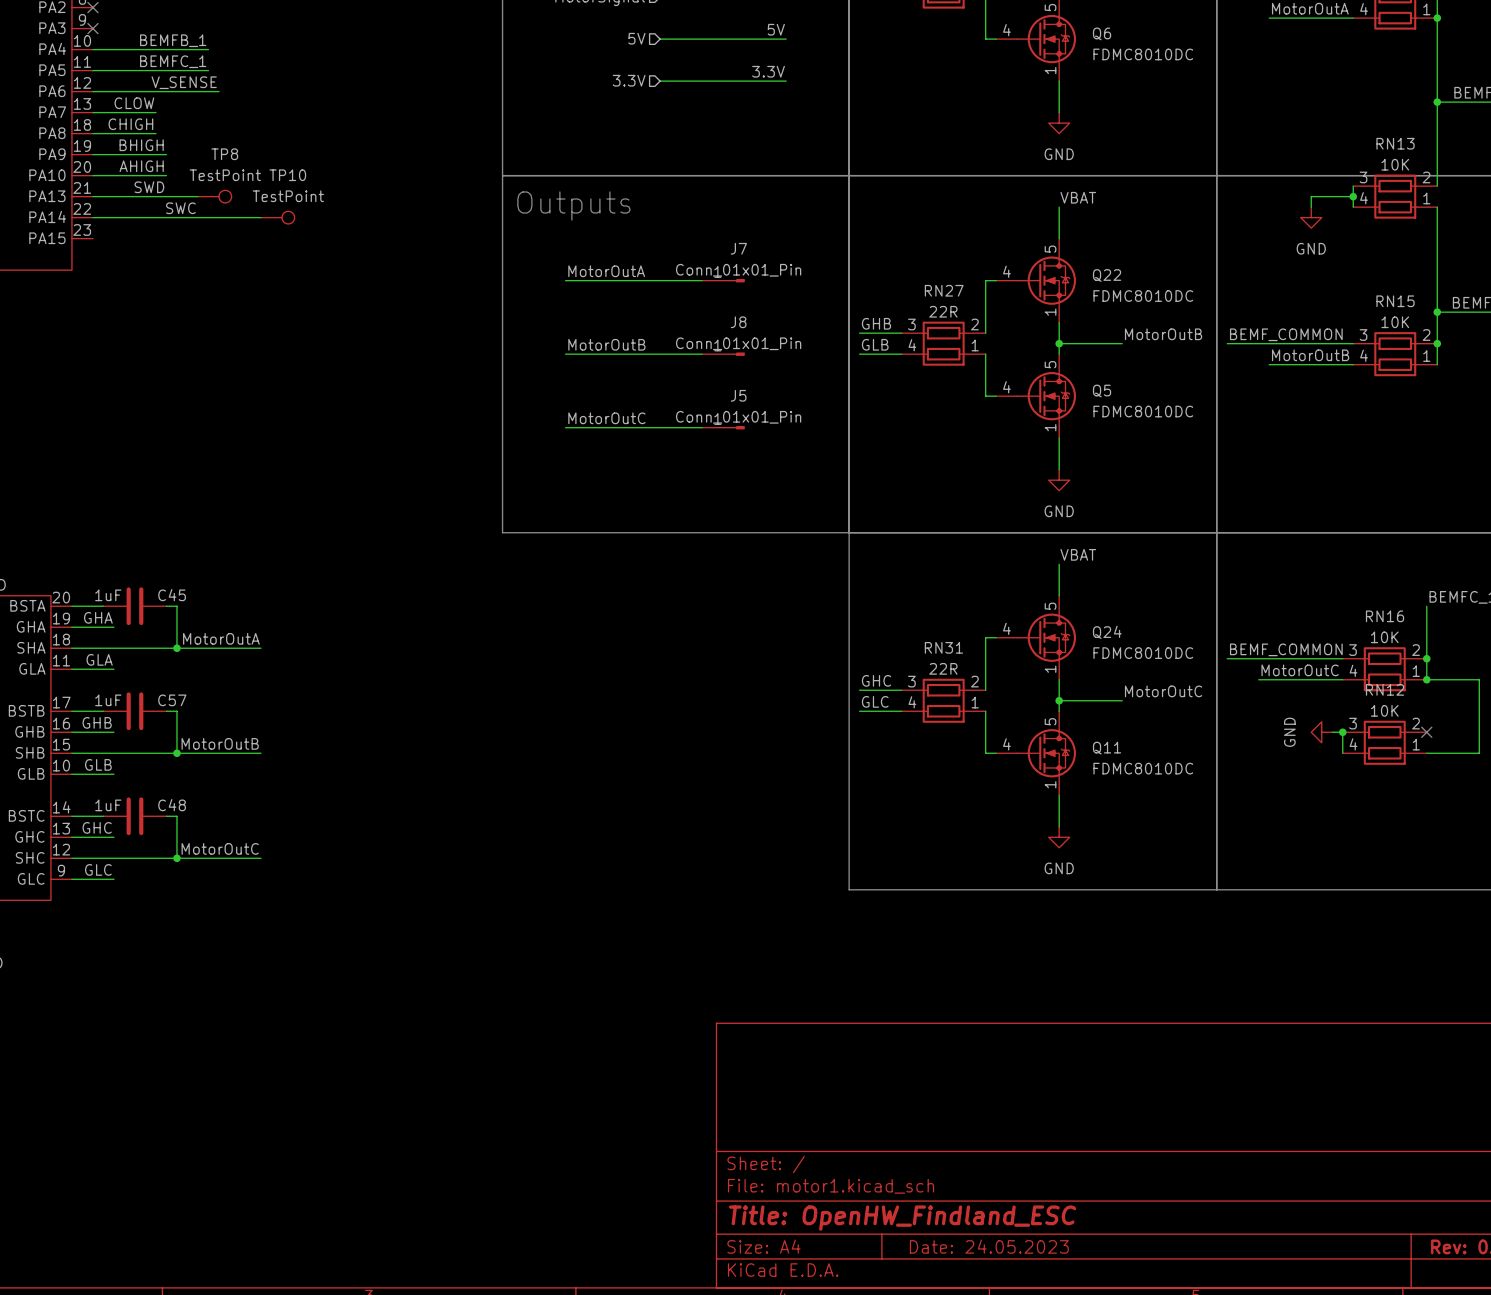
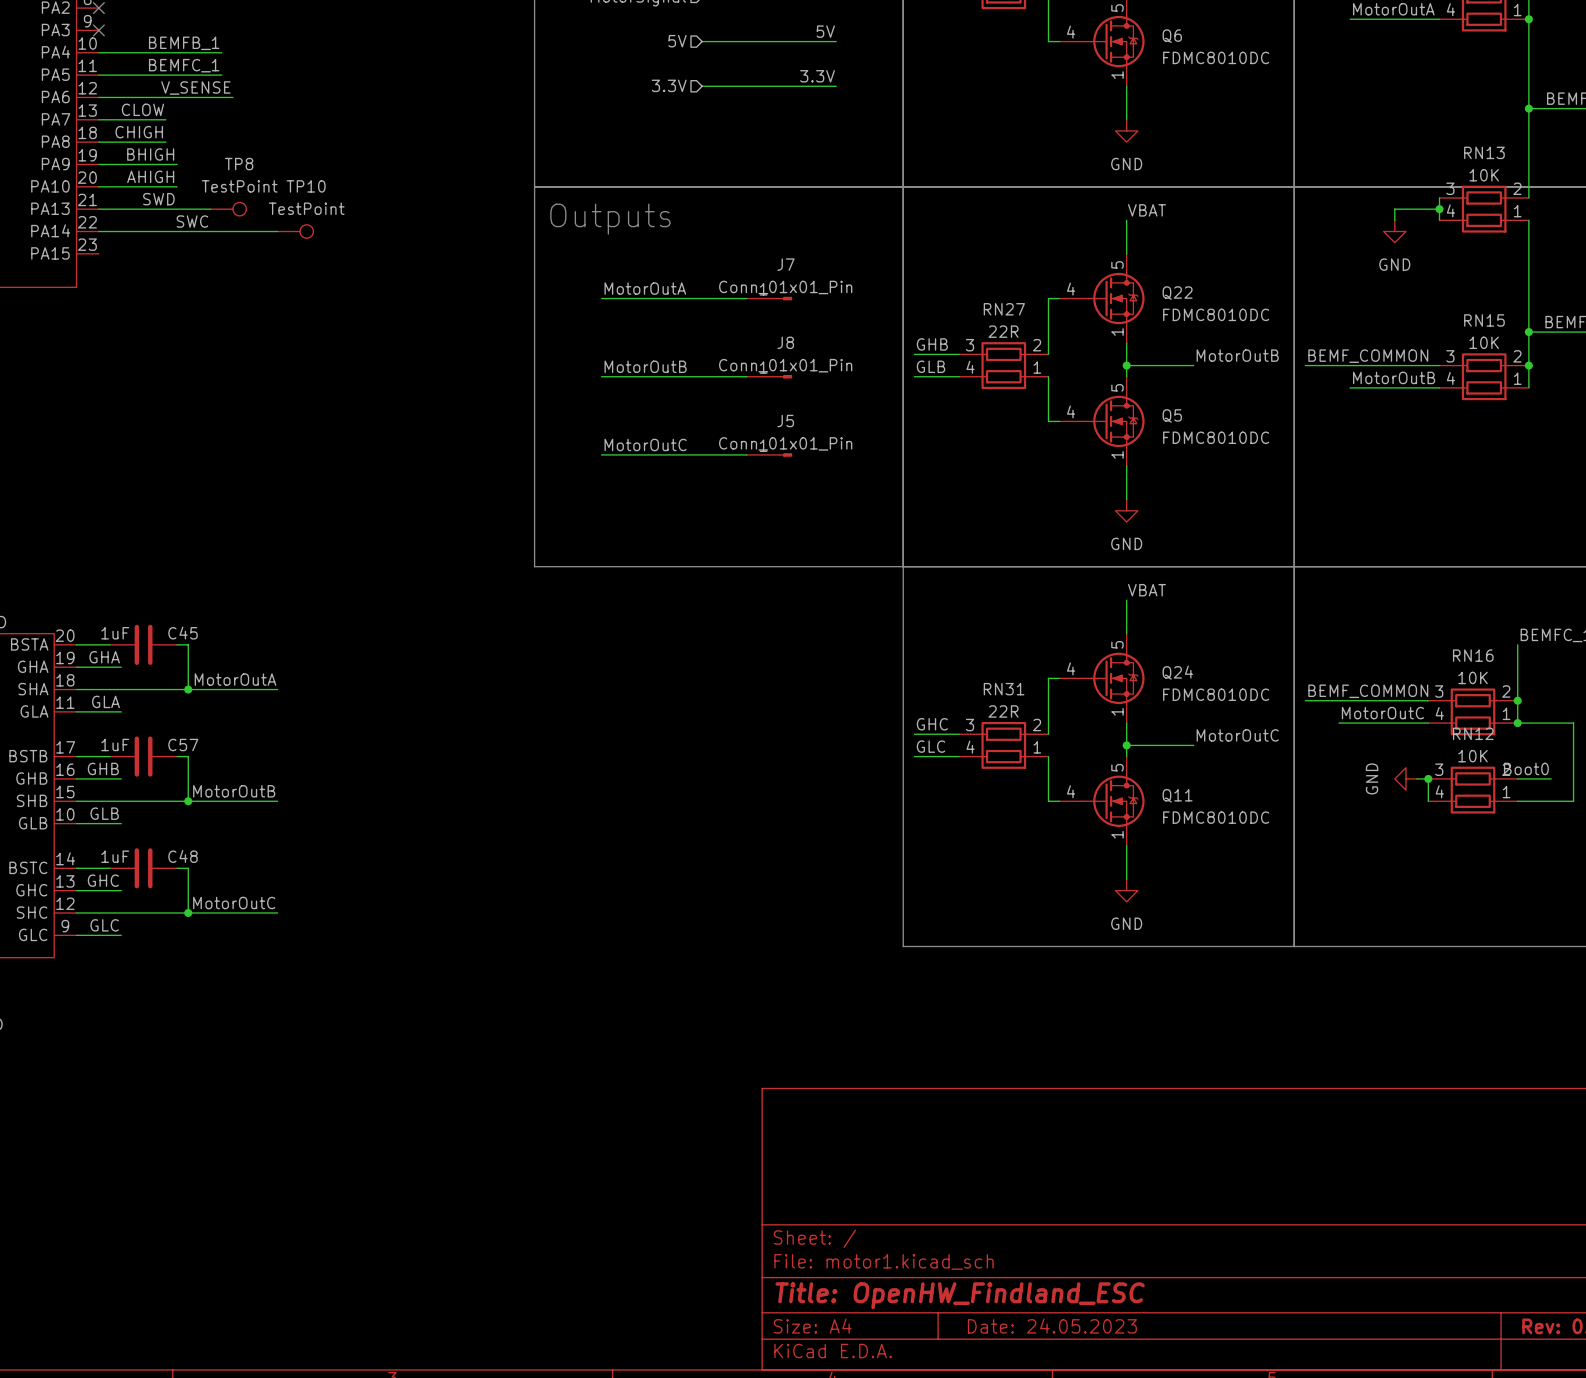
label: none -> Boot0 (1526, 768)
wire: none -> (1517, 778) (1551, 778)
no-connect mark: (1426, 732) -> none

